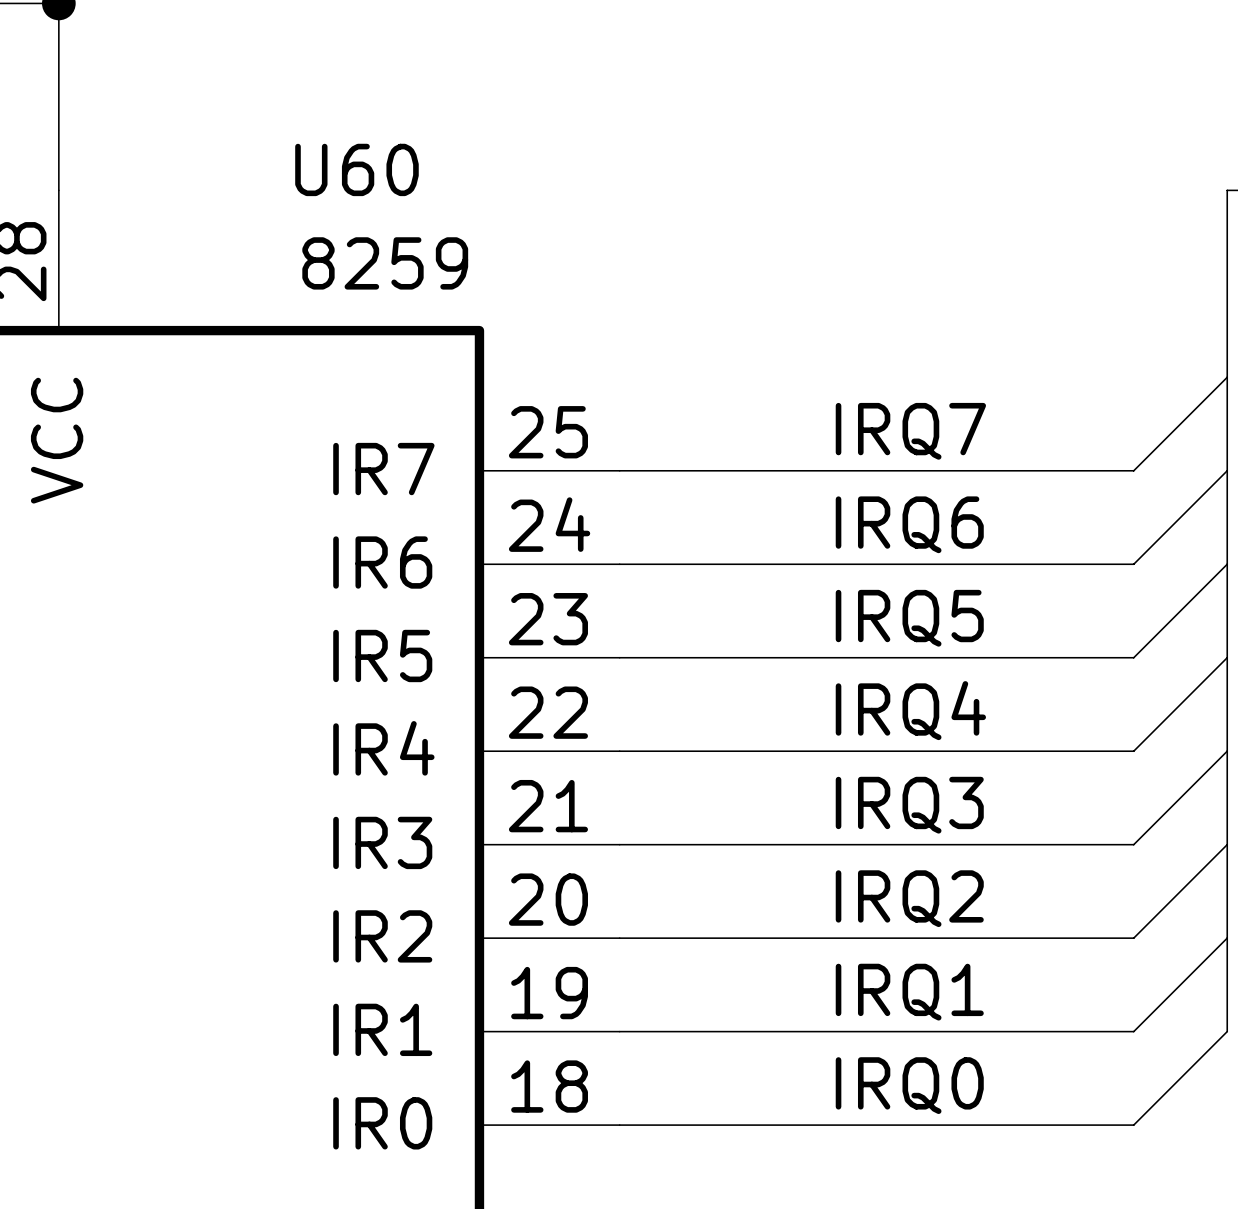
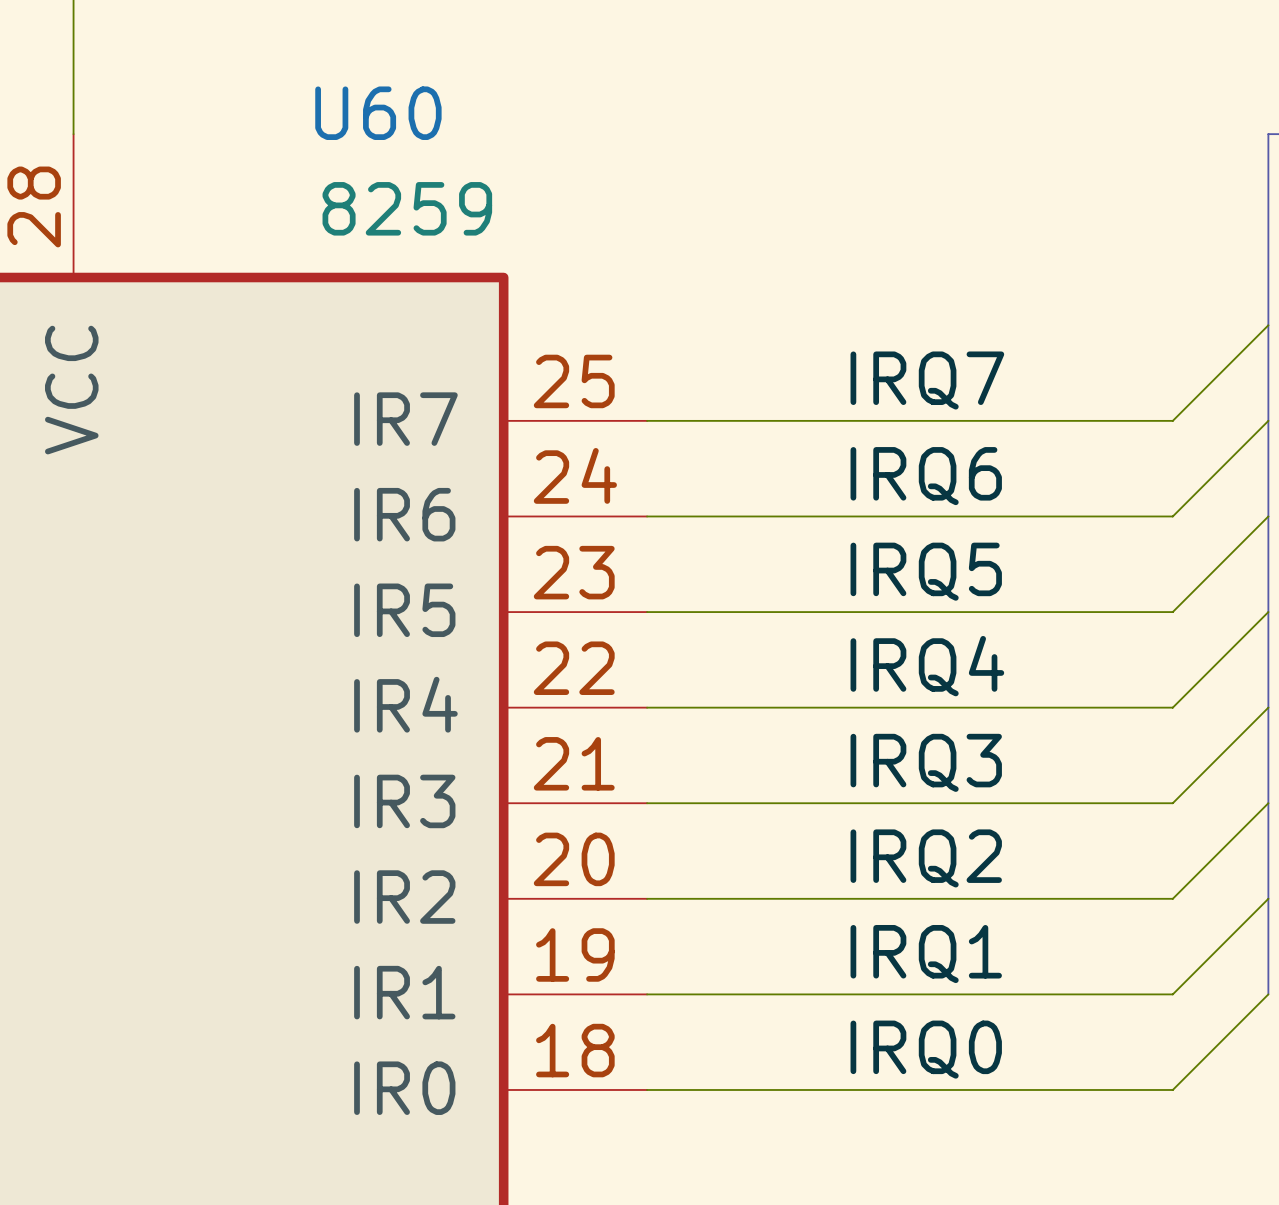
label position: IRQ7 (910, 431) -> IRQ7 (927, 380)
label position: IRQ6 (909, 524) -> IRQ6 (926, 476)
label position: IRQ5 (909, 618) -> IRQ5 (926, 571)
label position: IRQ4 (910, 710) -> IRQ4 (927, 666)
label position: IRQ3 (909, 805) -> IRQ3 (926, 762)
label position: IRQ2 (909, 898) -> IRQ2 (926, 858)
label position: IRQ1 (909, 992) -> IRQ1 (926, 954)
label position: IRQ0 (909, 1085) -> IRQ0 (926, 1049)

